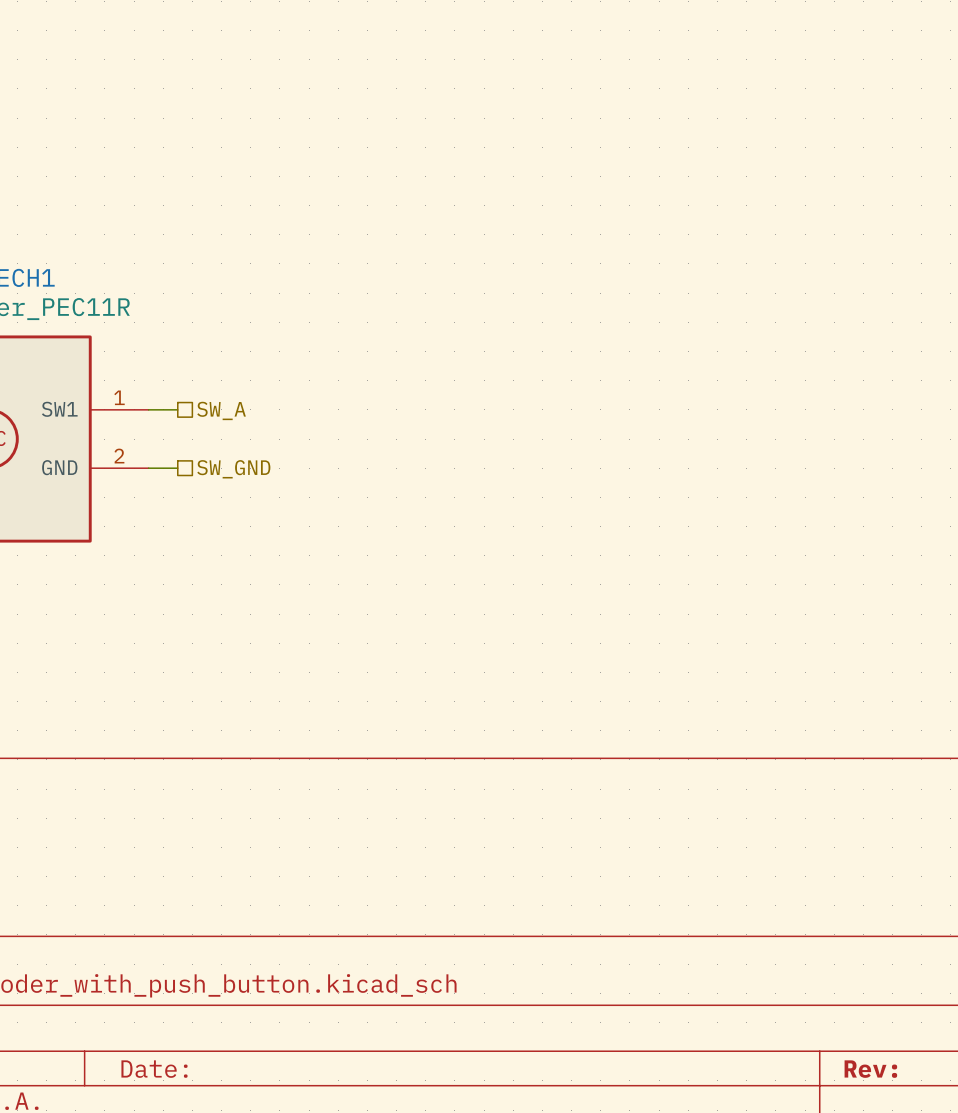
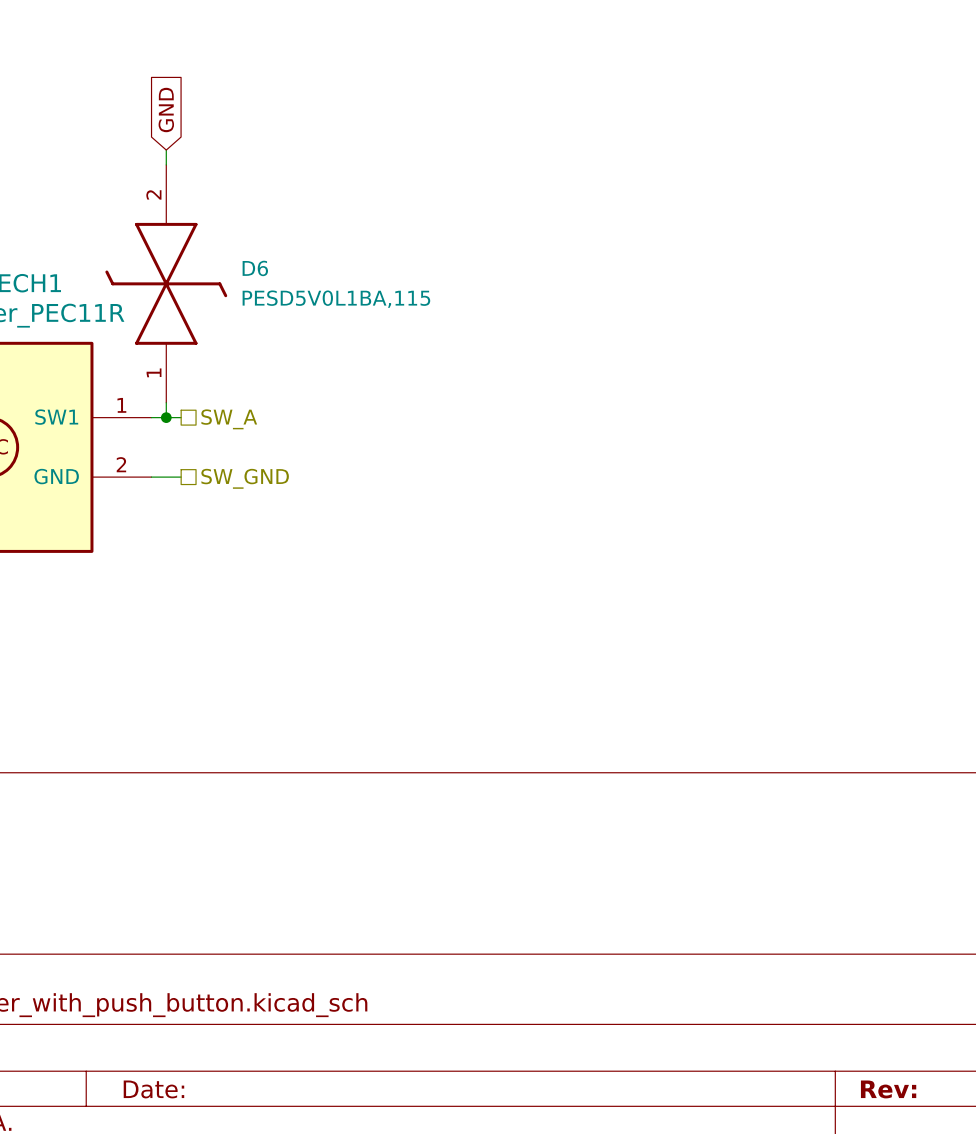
global label: none -> GND (166, 110)
wire: none -> (166, 150) (166, 164)
D6: none -> PESD5V0L1BA,115 (166, 283)
wire: none -> (166, 402) (166, 417)
junction: none -> (166, 417)

